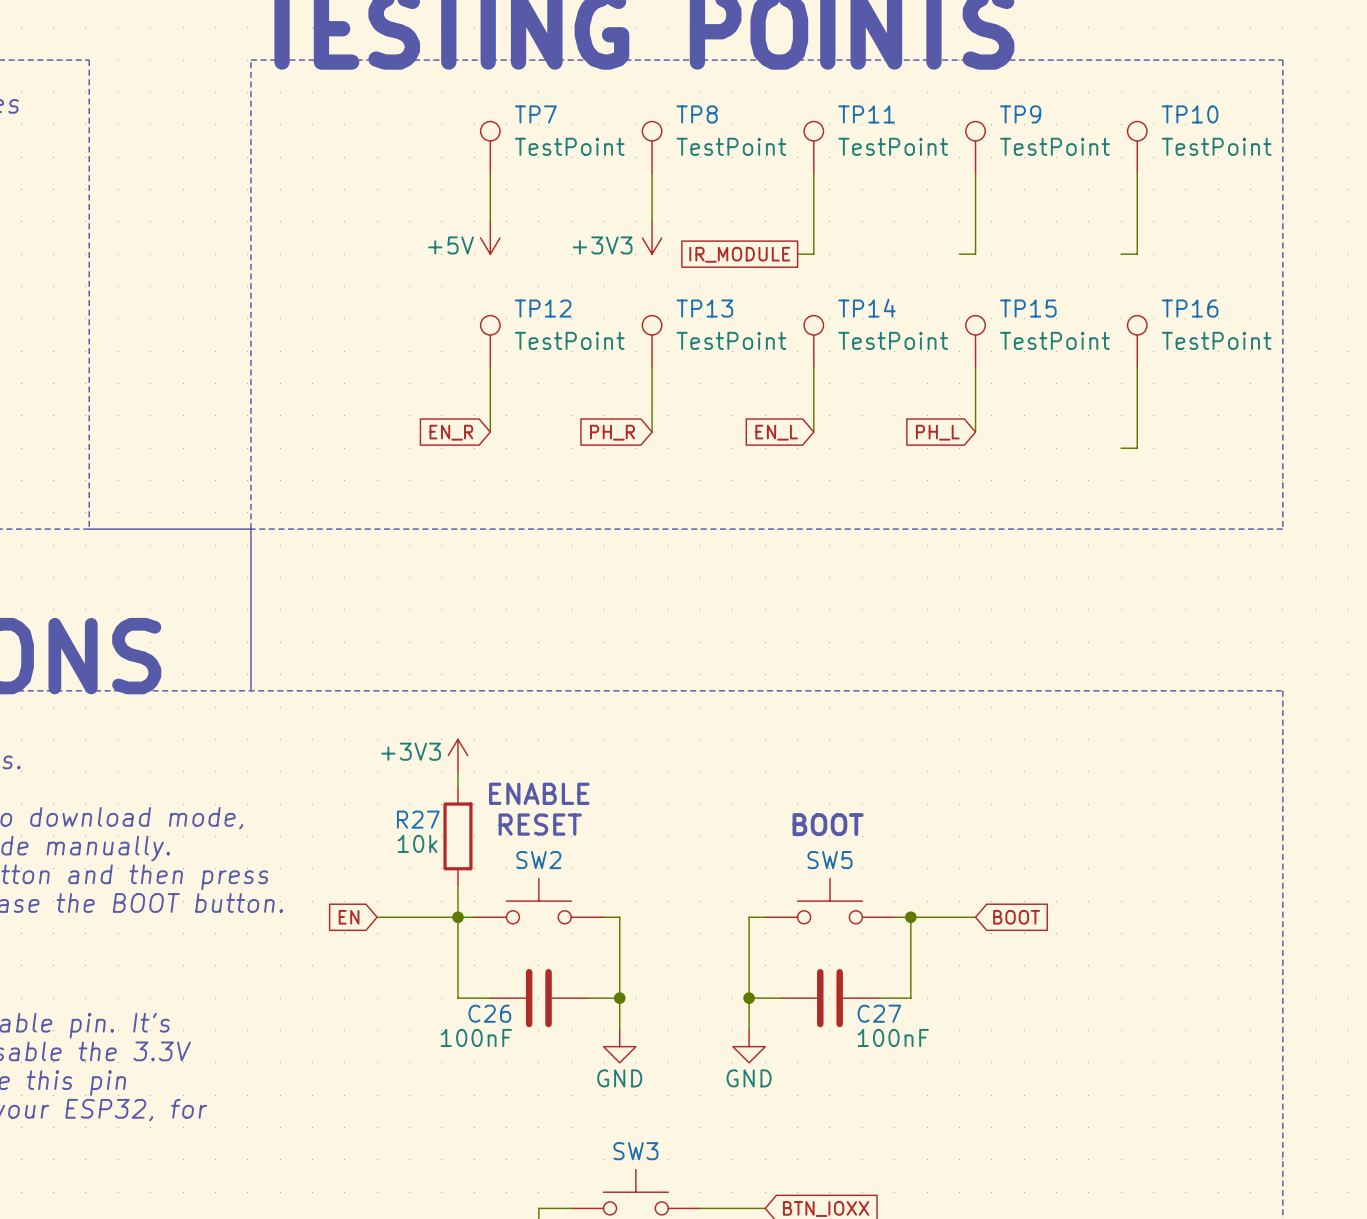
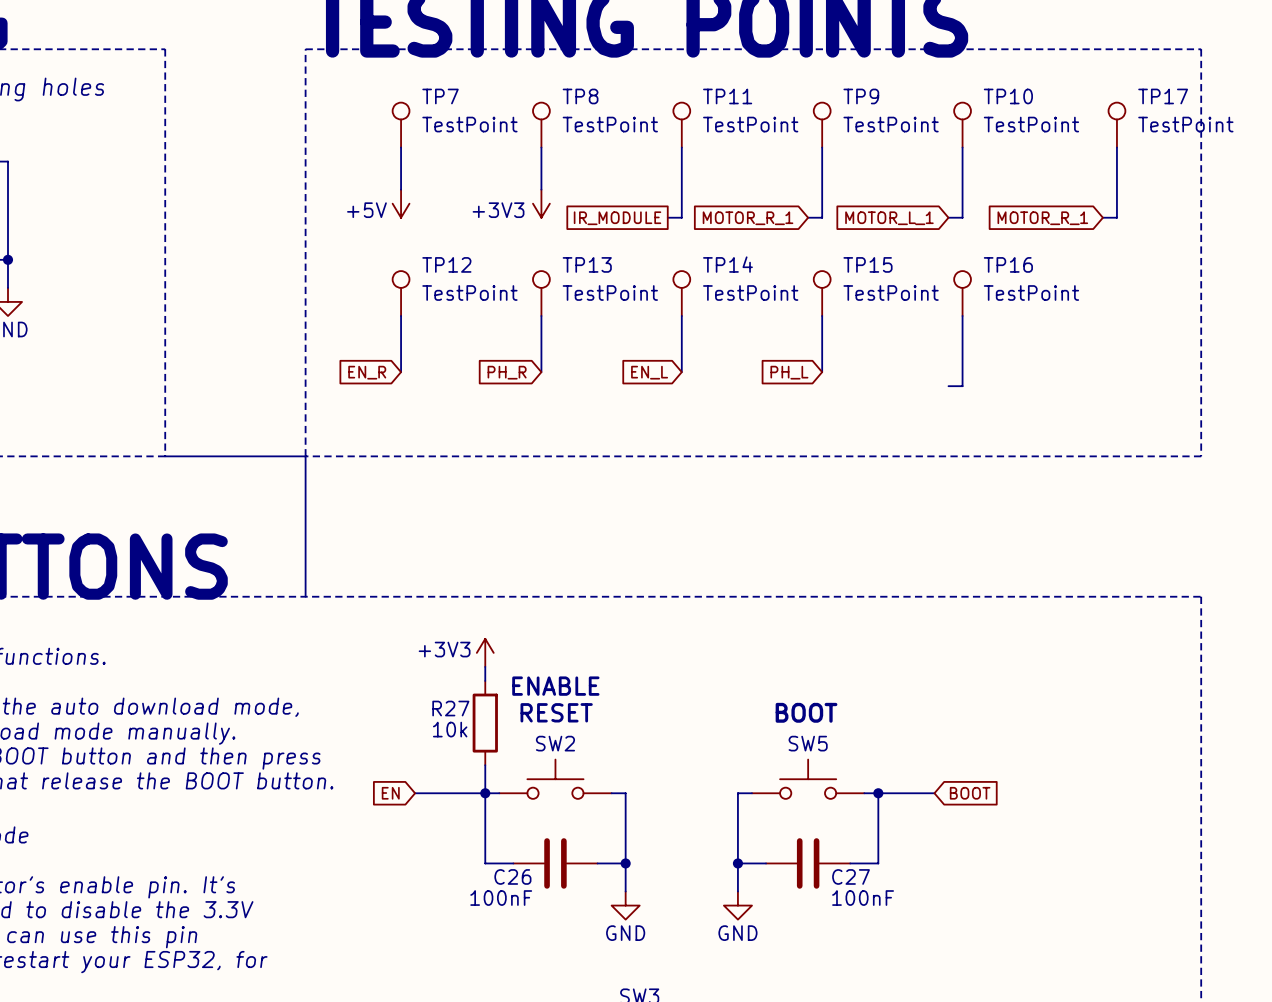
TP7 position: (490, 147) -> (401, 125)
TP8 position: (652, 147) -> (541, 125)
TP11 position: (813, 147) -> (681, 125)
TP9 position: (975, 147) -> (822, 125)
TP10 position: (1137, 147) -> (962, 125)
TP17: none -> TestPoint (1116, 125)
wire: (490, 173) (490, 221) -> (401, 147) (401, 189)
wire: (652, 173) (652, 221) -> (541, 147) (541, 189)
wire: (813, 173) (813, 254) (797, 254) -> (681, 147) (681, 217) (667, 217)
wire: (975, 173) (975, 254) (959, 254) -> (822, 147) (822, 217) (808, 217)
wire: (1137, 173) (1137, 254) (1121, 254) -> (962, 147) (962, 217) (948, 217)
wire: none -> (1116, 147) (1116, 217) (1102, 217)
power symbol position: +5V (490, 237) -> +5V (401, 203)
power symbol position: +3V3 (652, 237) -> +3V3 (541, 203)
global label position: IR_MODULE (739, 254) -> IR_MODULE (617, 218)
global label: none -> MOTOR_R_1 (748, 218)
global label: none -> MOTOR_L_1 (889, 218)
global label: none -> MOTOR_R_1 (1042, 218)
TP12 position: (490, 341) -> (401, 293)
TP13 position: (652, 341) -> (541, 293)
TP14 position: (813, 341) -> (681, 293)
TP15 position: (975, 341) -> (822, 293)
TP16 position: (1137, 341) -> (962, 293)
wire: (490, 367) (490, 432) -> (401, 315) (401, 372)
wire: (652, 367) (652, 432) -> (541, 315) (541, 372)
wire: (813, 367) (813, 432) -> (681, 315) (681, 372)
wire: (975, 367) (975, 432) -> (822, 315) (822, 372)
wire: (1137, 367) (1137, 448) (1121, 448) -> (962, 315) (962, 386) (948, 386)
global label position: EN_R (451, 432) -> EN_R (367, 372)
global label position: PH_R (612, 432) -> PH_R (507, 372)
global label position: EN_L (776, 432) -> EN_L (649, 372)
global label position: PH_L (937, 432) -> PH_L (789, 372)

